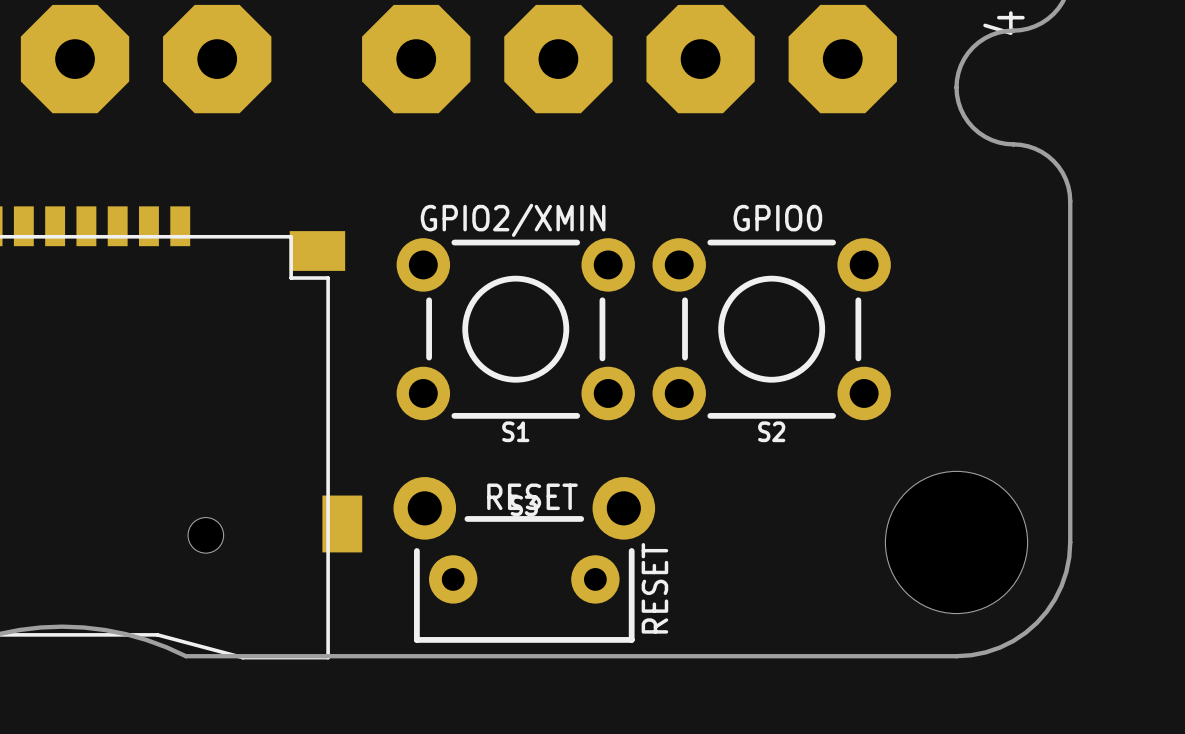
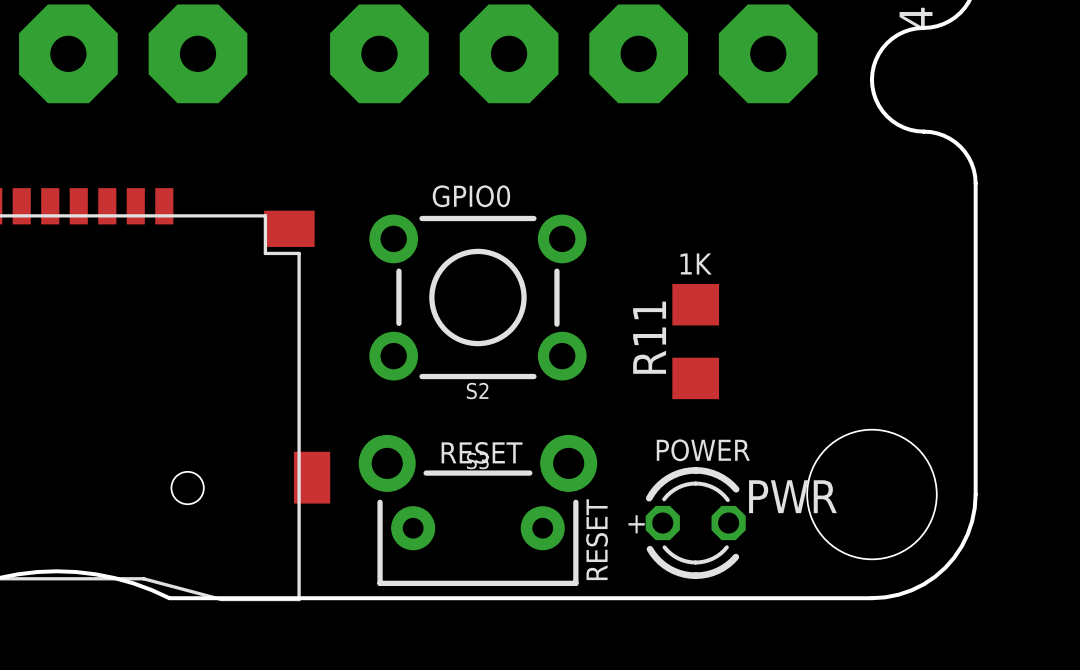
text position: GPIO0 (777, 218) -> GPIO0 (471, 196)
text: GPIO2/XMIN (513, 220) -> none
text: none -> 1K (696, 263)
S1: (515, 329) -> none
S2 position: (771, 329) -> (477, 297)
R11: none -> (695, 341)
text: none -> POWER (703, 450)
PWR: none -> (695, 523)
text: none -> + (636, 524)

